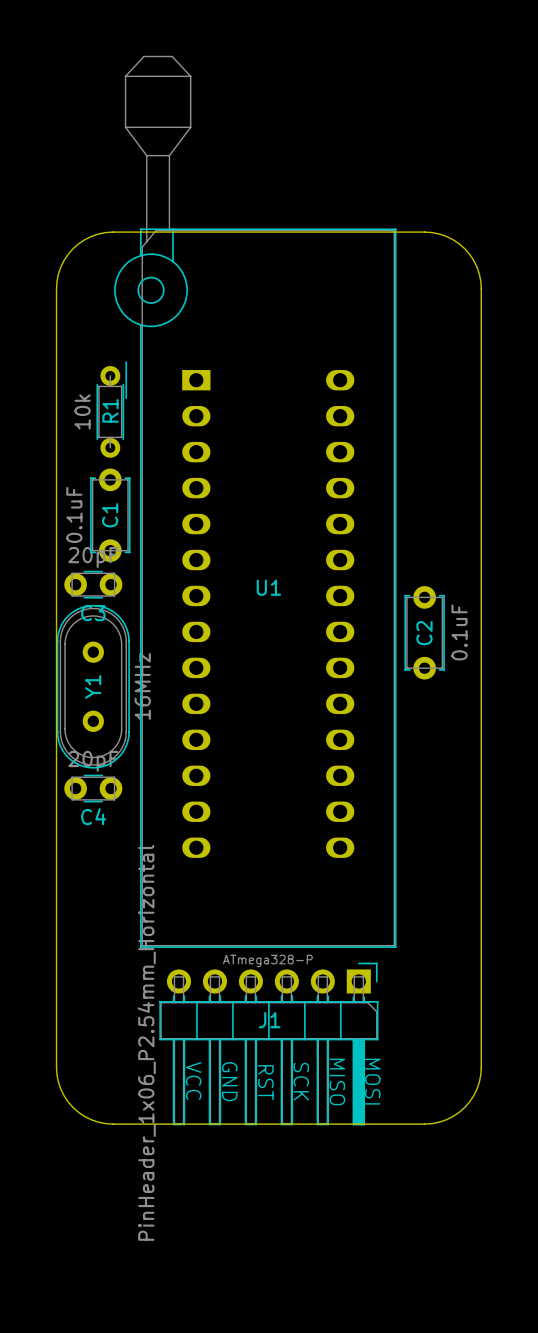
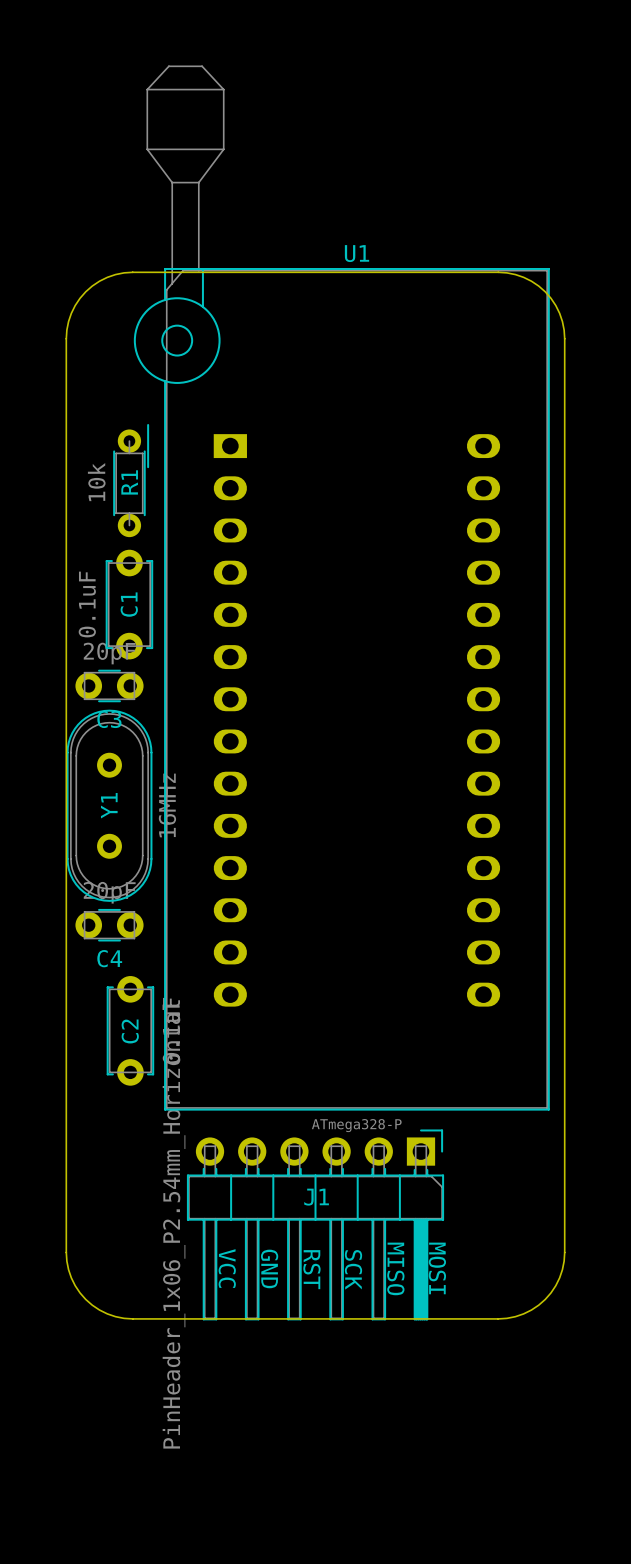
U1 footprint: [114, 55, 397, 948] -> [133, 65, 550, 1111]
U1 name position: U1 (268, 587) -> U1 (357, 253)
C2 position: (424, 632) -> (130, 1030)

